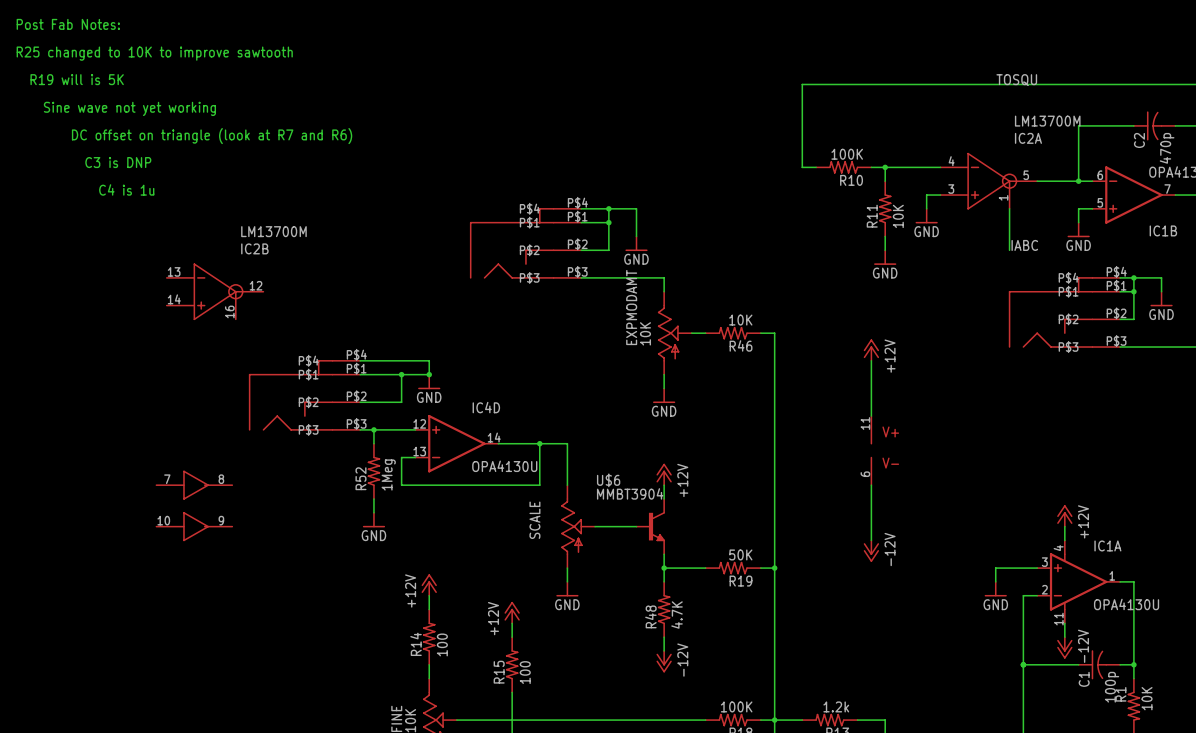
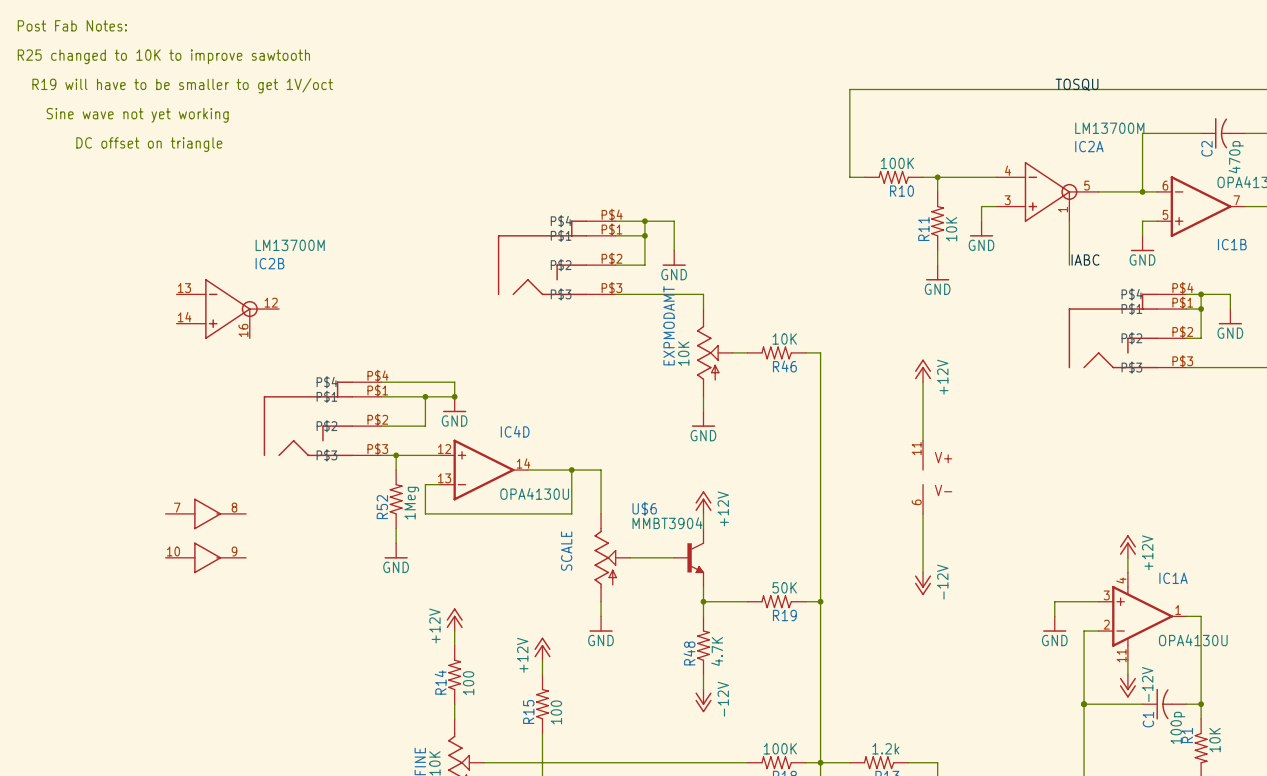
text: R19 will is 5K (77, 79) -> R19 will have to be smaller to get 1V/oct (182, 85)
text: DC offset on triangle (look at R7 and R6) (212, 136) -> DC offset on triangle (149, 144)
text: C3 is DNP (118, 162) -> none
text: C4 is 1u (126, 189) -> none

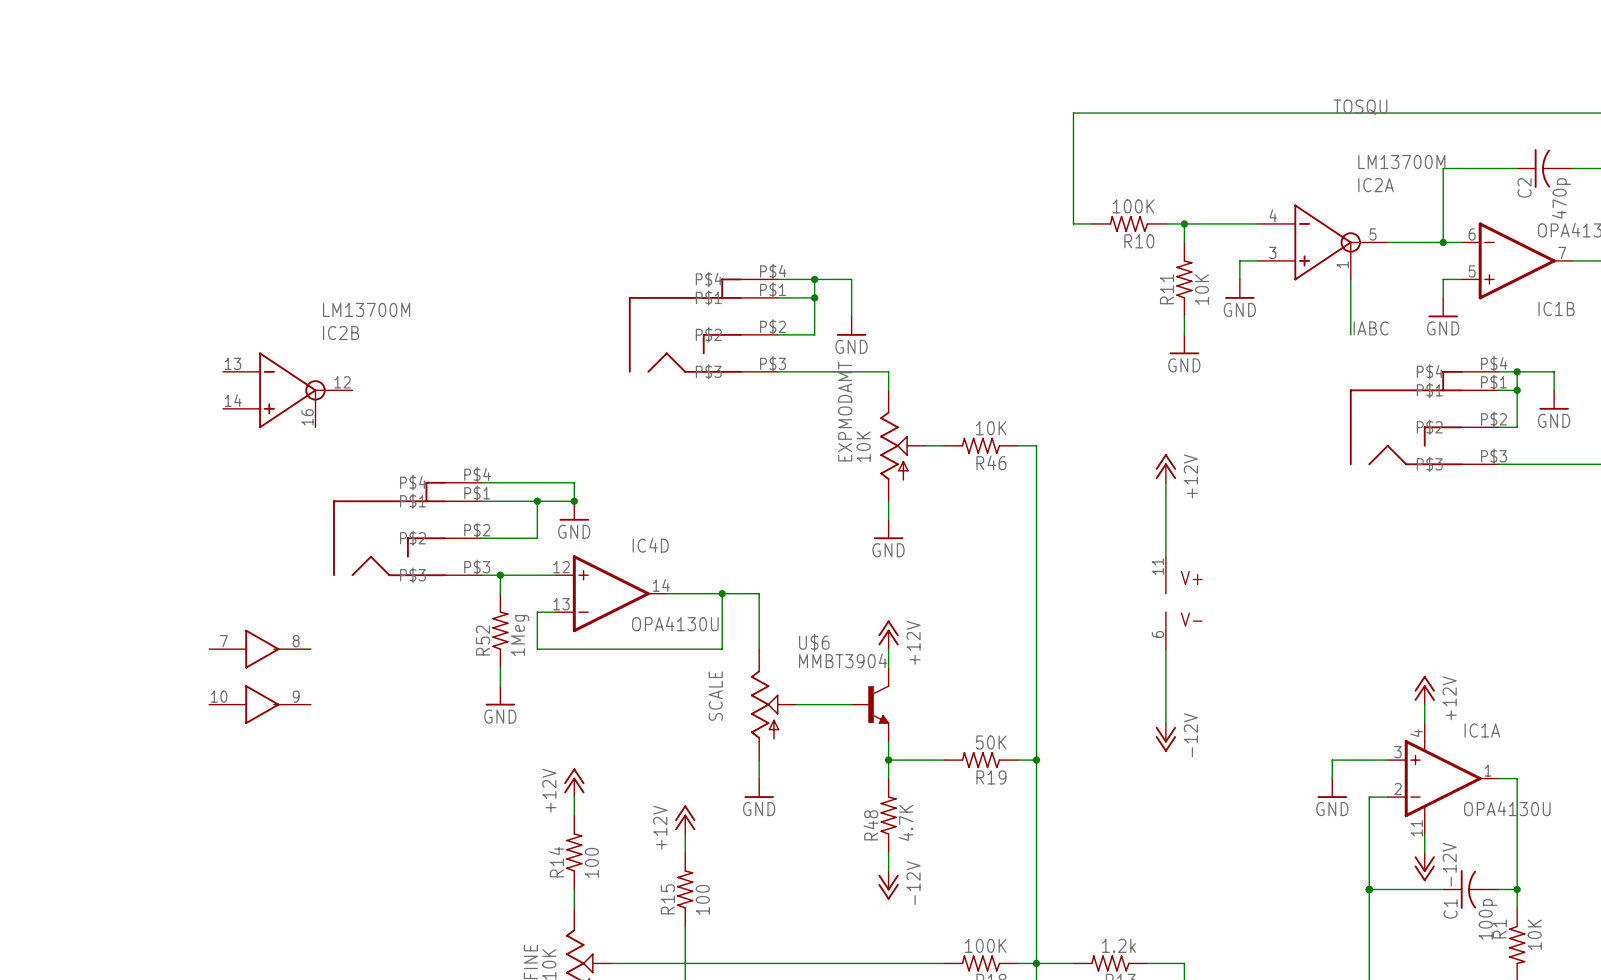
text: Post Fab Notes: (72, 25) -> none
text: R25 changed to 10K to improve sawtooth (163, 56) -> none
text: R19 will have to be smaller to get 1V/oct (182, 85) -> none
text: Sine wave not yet working (137, 115) -> none
text: DC offset on triangle (149, 144) -> none

